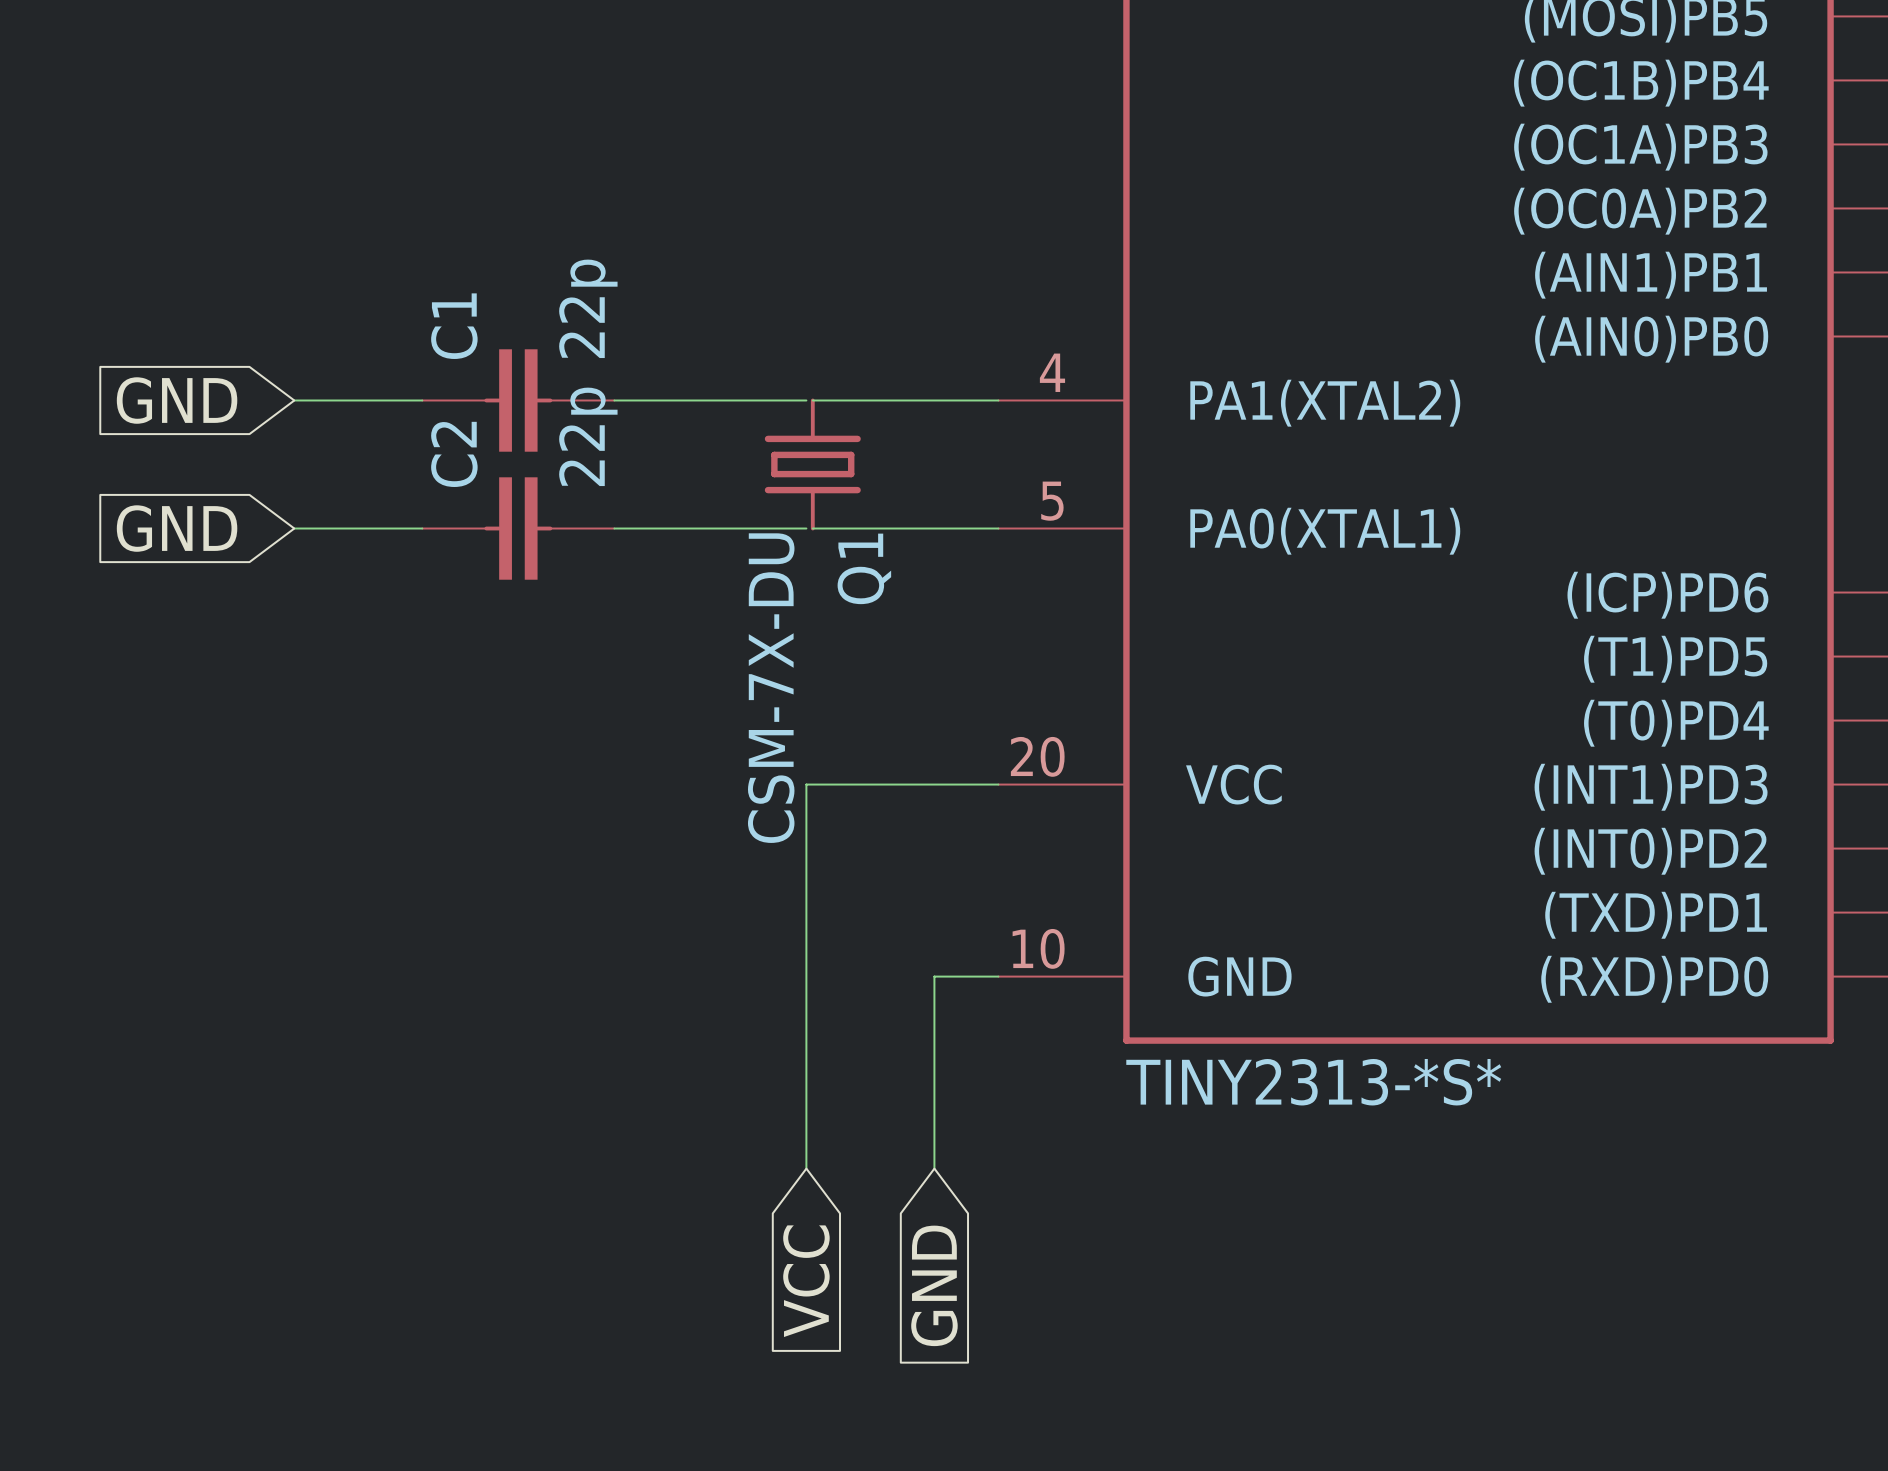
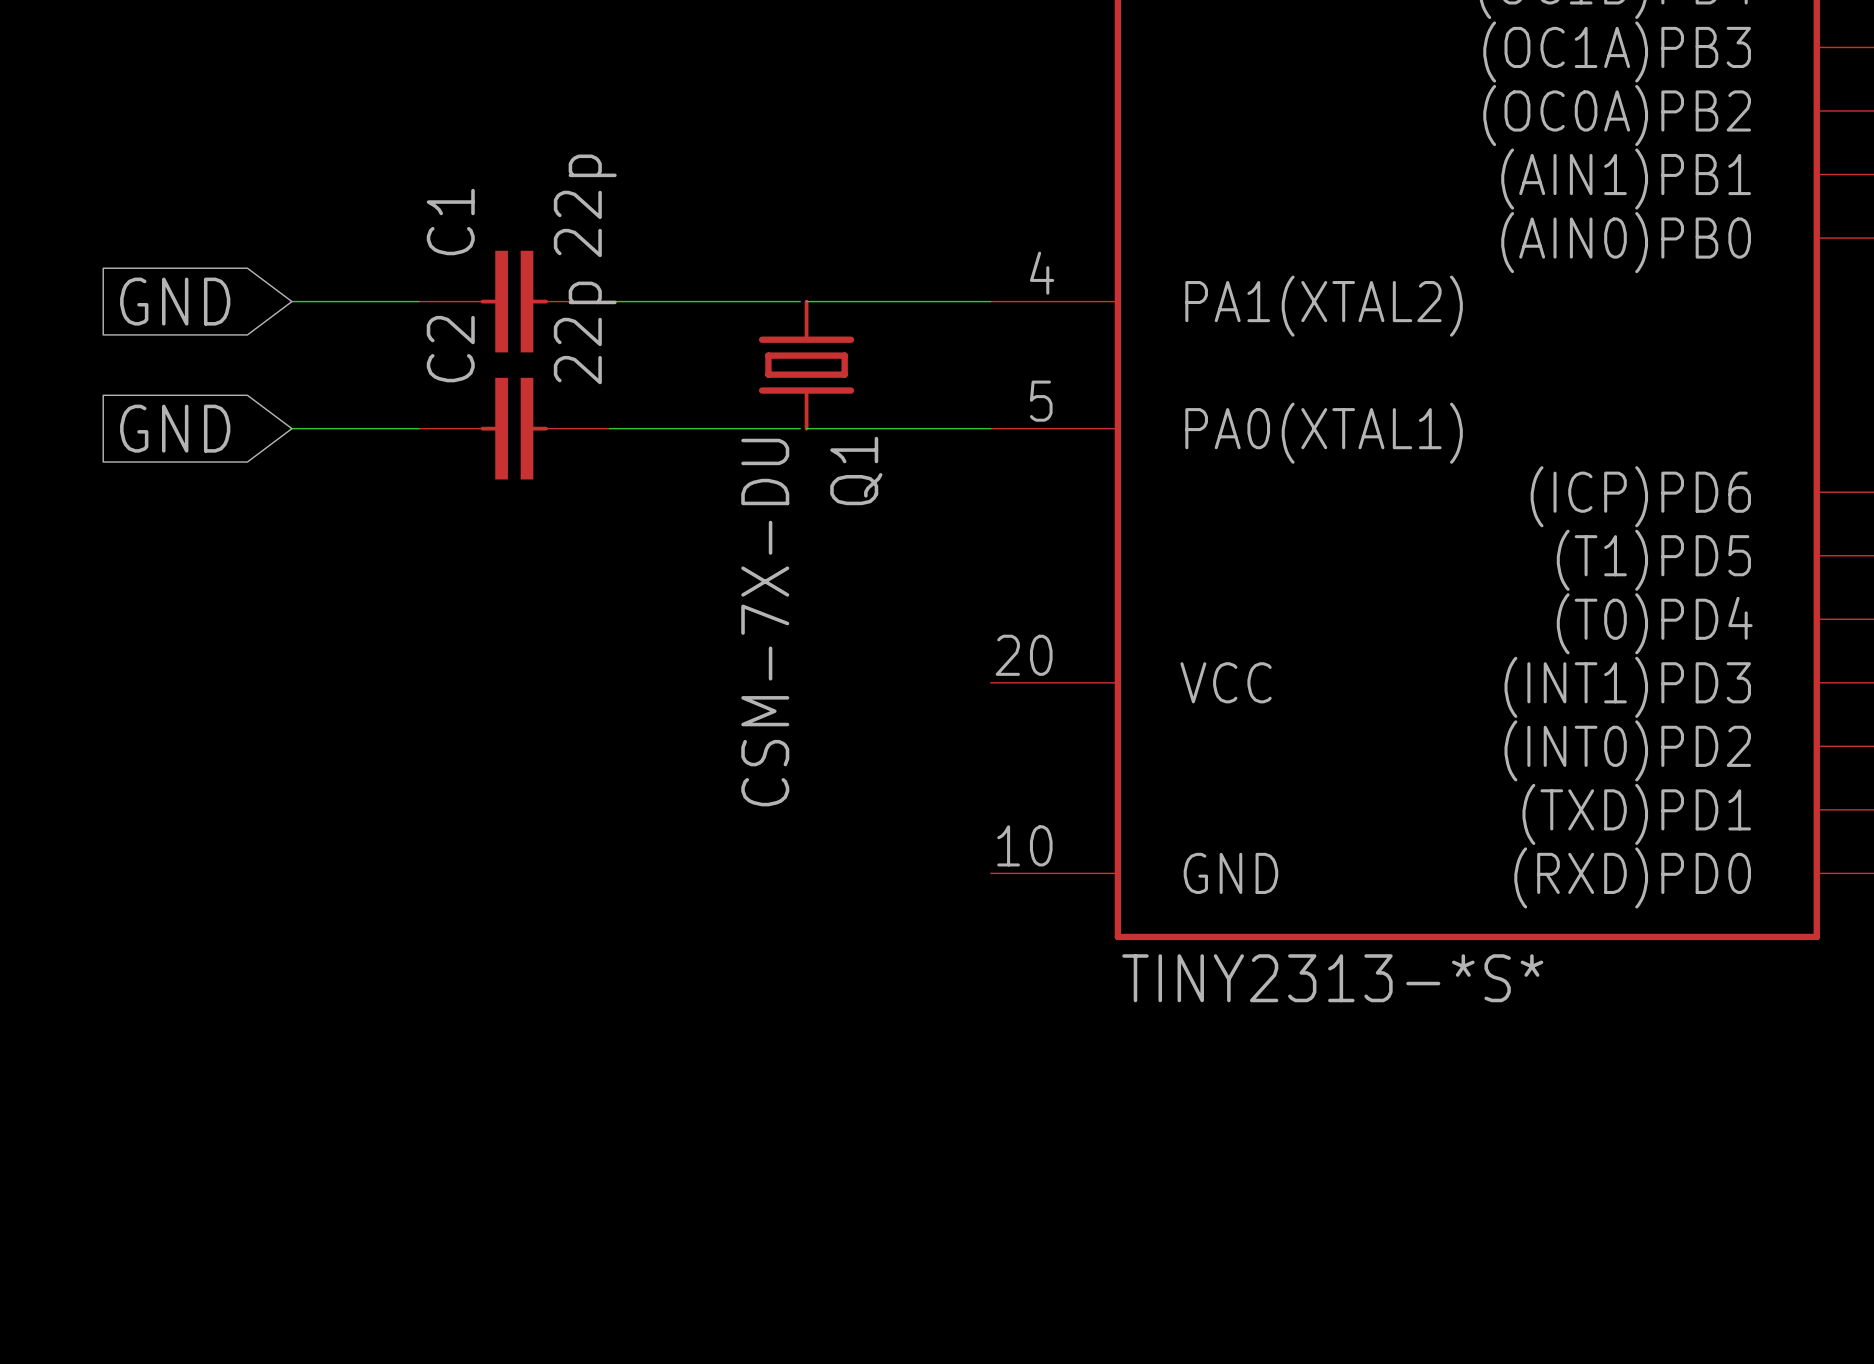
wire: (998, 784) (806, 784) (806, 1168) -> none
wire: (998, 976) (934, 976) (934, 1168) -> none
global label: VCC (806, 1281) -> none
global label: GND (934, 1285) -> none

